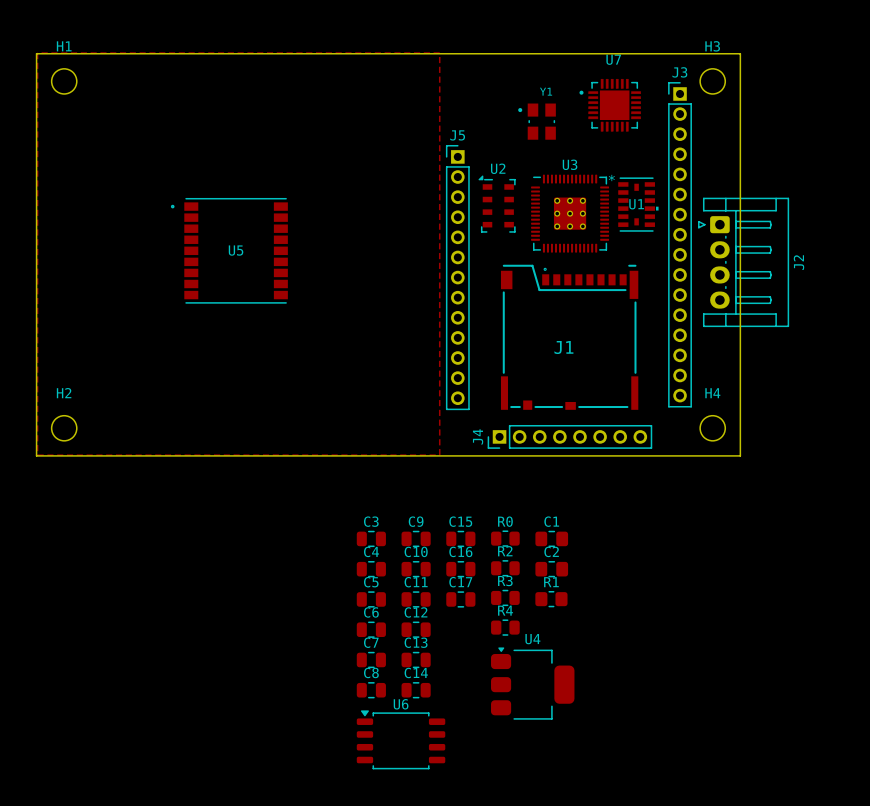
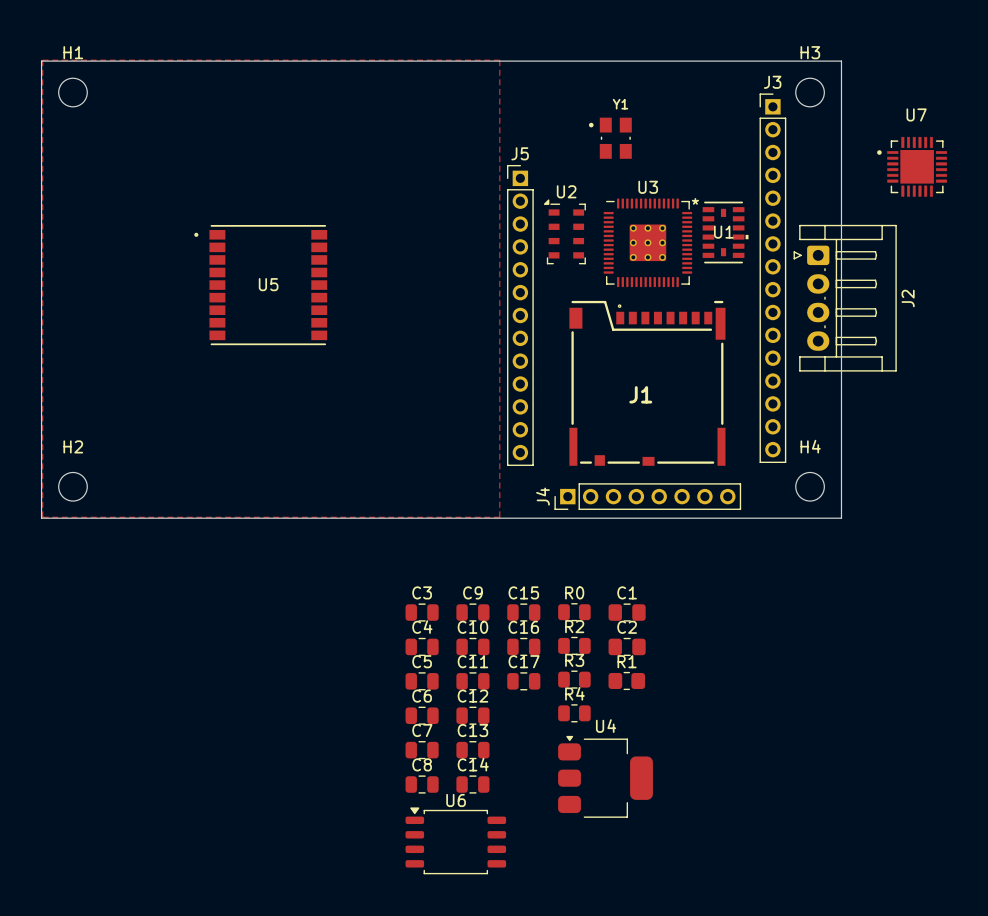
U7 position: (610, 105) -> (912, 166)

